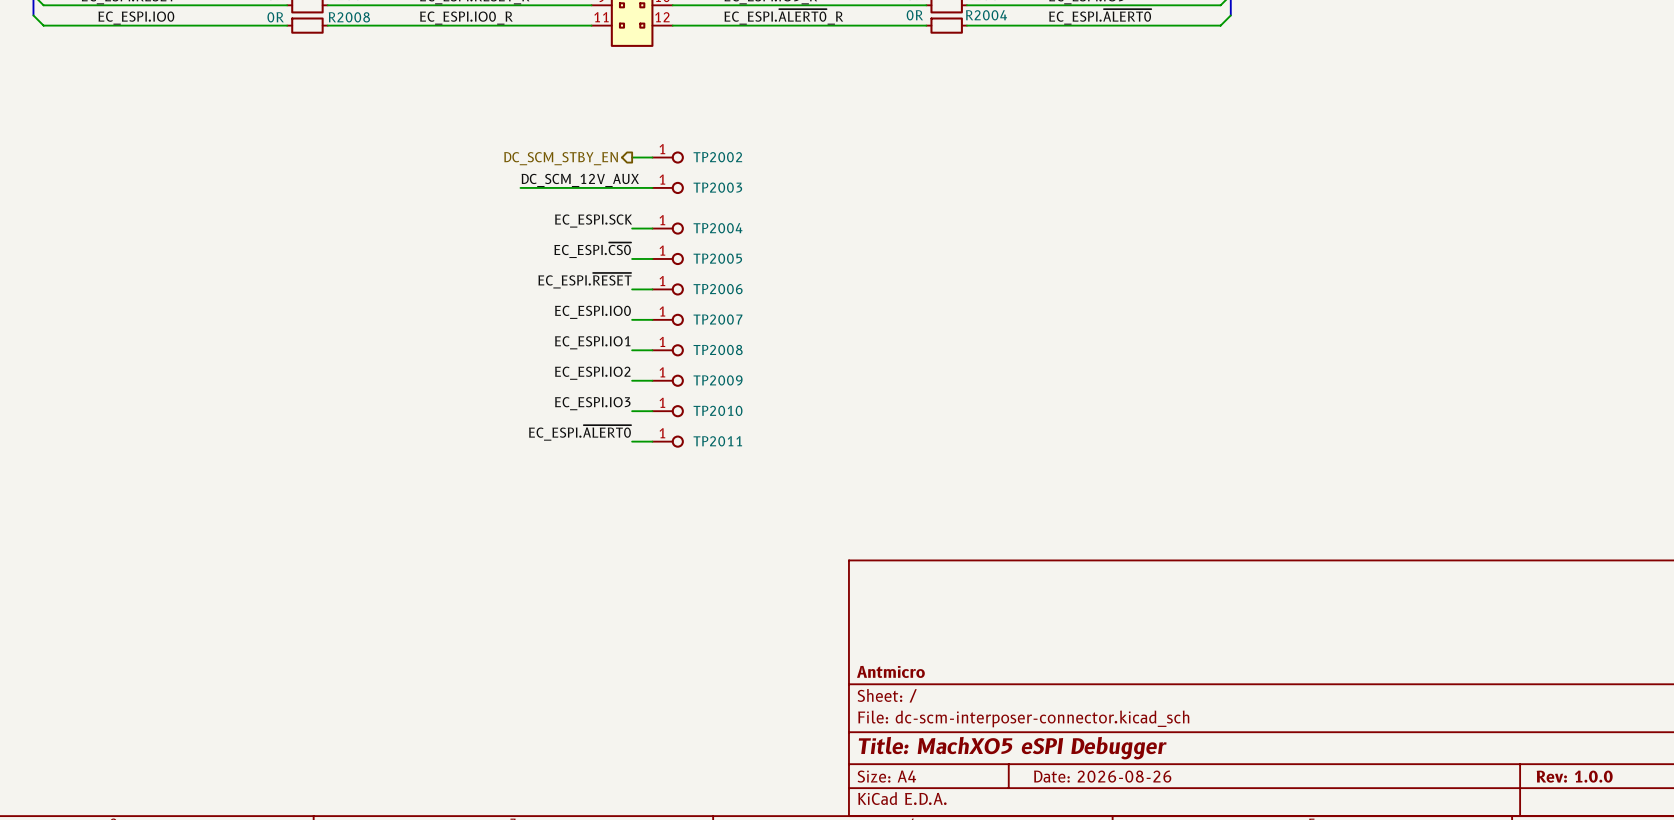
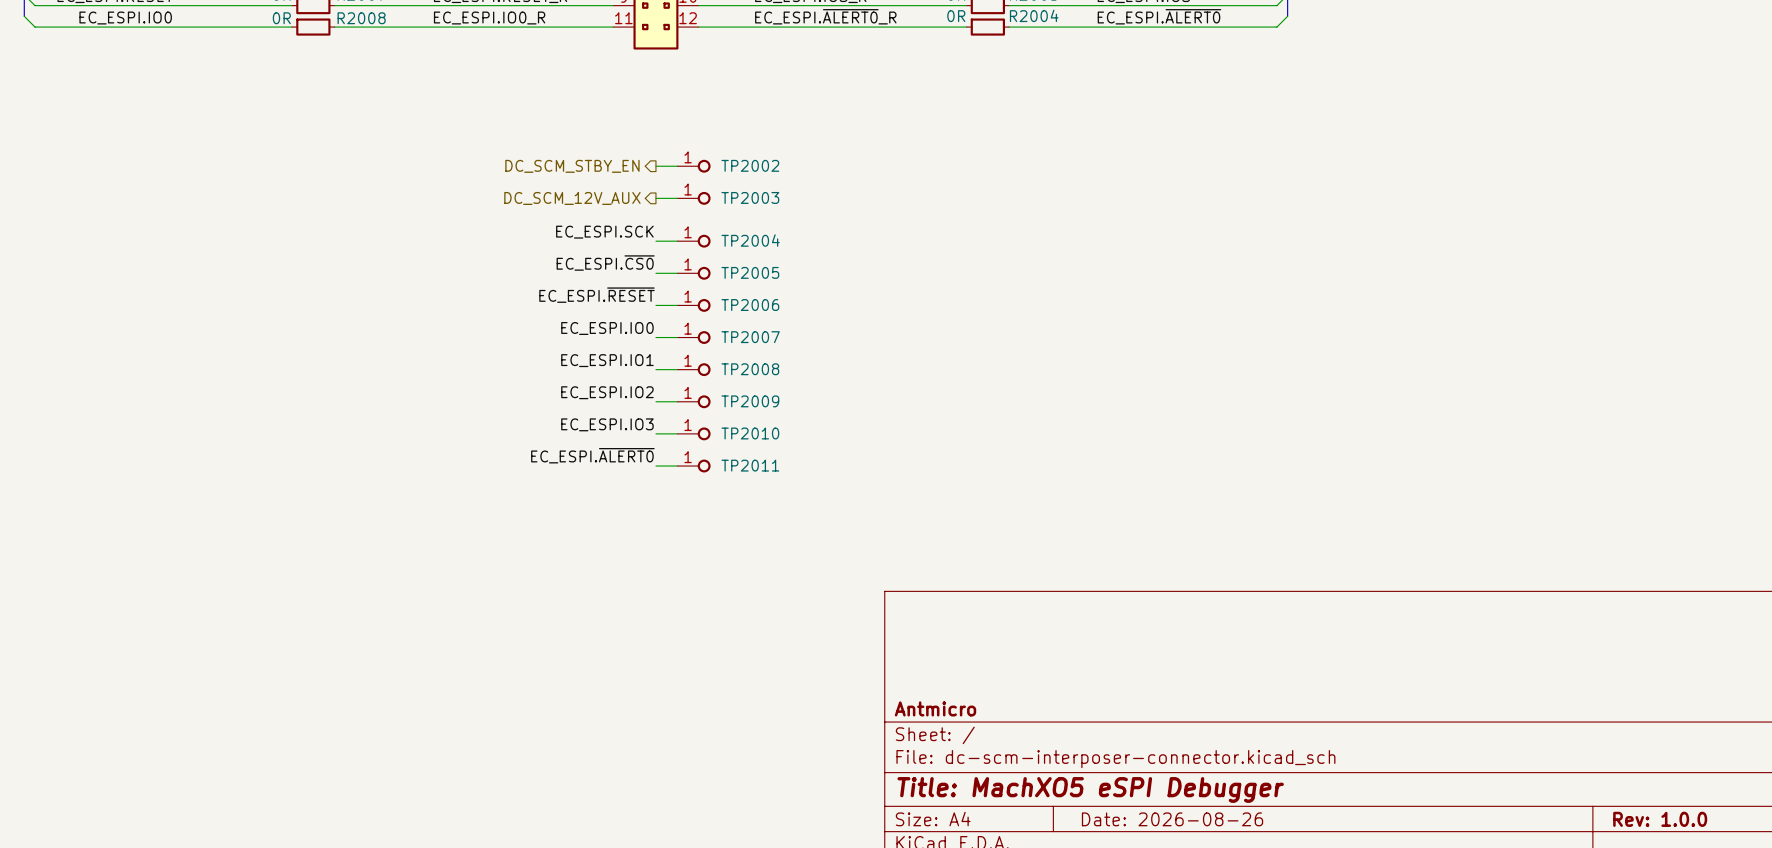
label: DC_SCM_12V_AUX (580, 180) -> none
wire: (520, 187) (632, 187) -> none
hierarchical label: none -> DC_SCM_12V_AUX (572, 198)

